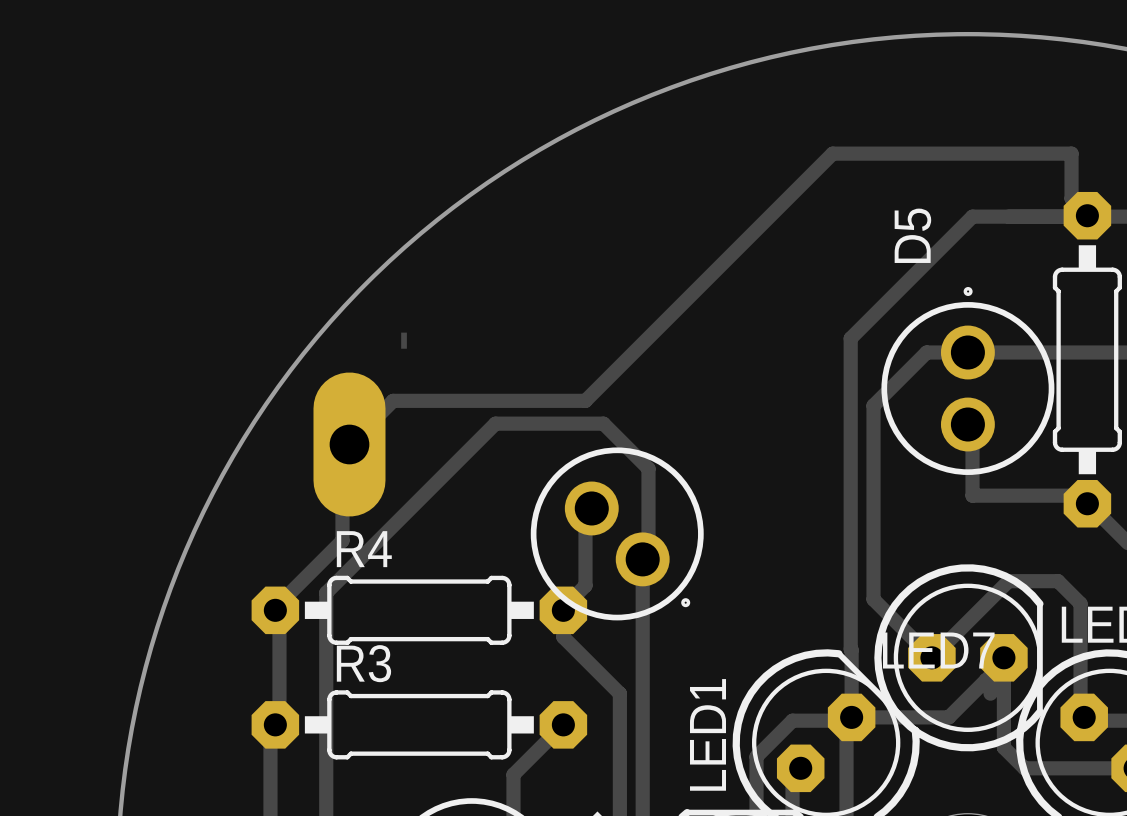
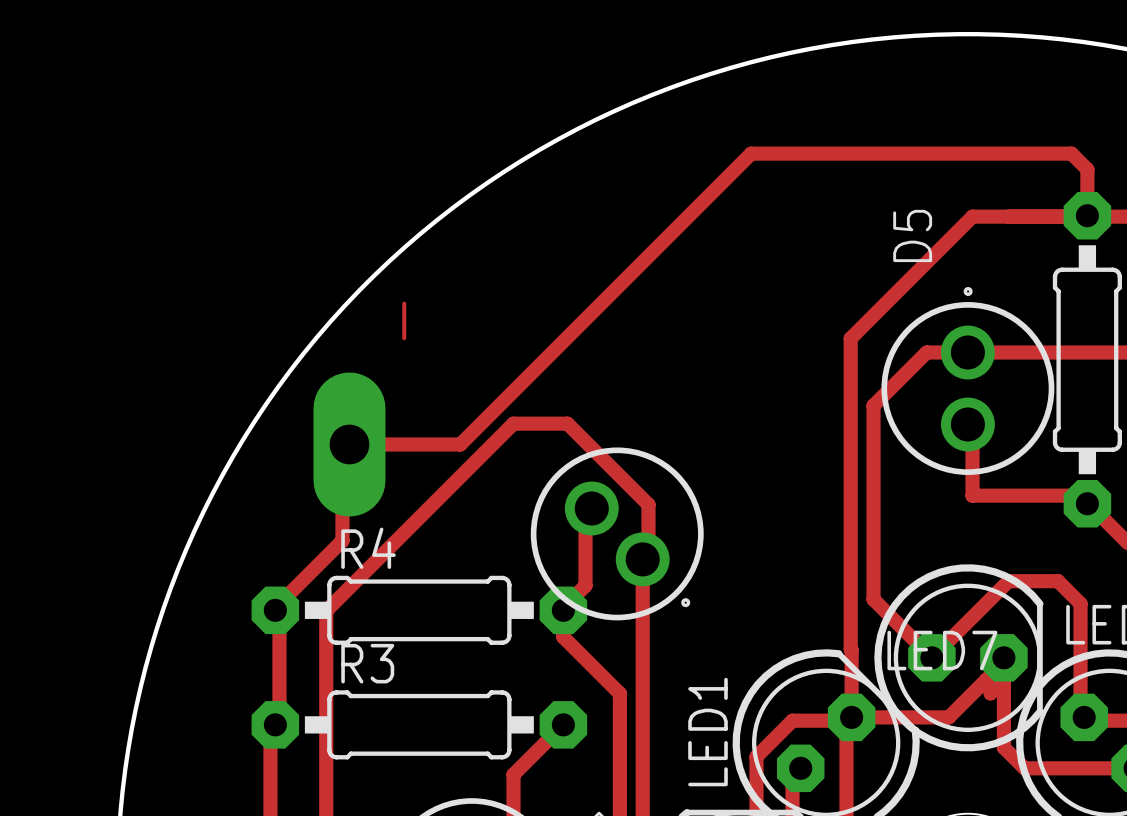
track: (832, 153) (585, 400) (393, 400) (349, 444) -> (832, 153) (751, 153) (460, 444) (349, 444)
track: (1071, 153) (1071, 198) (1089, 216) -> (1071, 153) (1087, 169) (1087, 215)
track: (513, 423) (495, 423) (326, 592) (326, 610) -> (513, 423) (326, 610)
track: (567, 423) (603, 423) (648, 468) (648, 504) -> (567, 423) (648, 504)

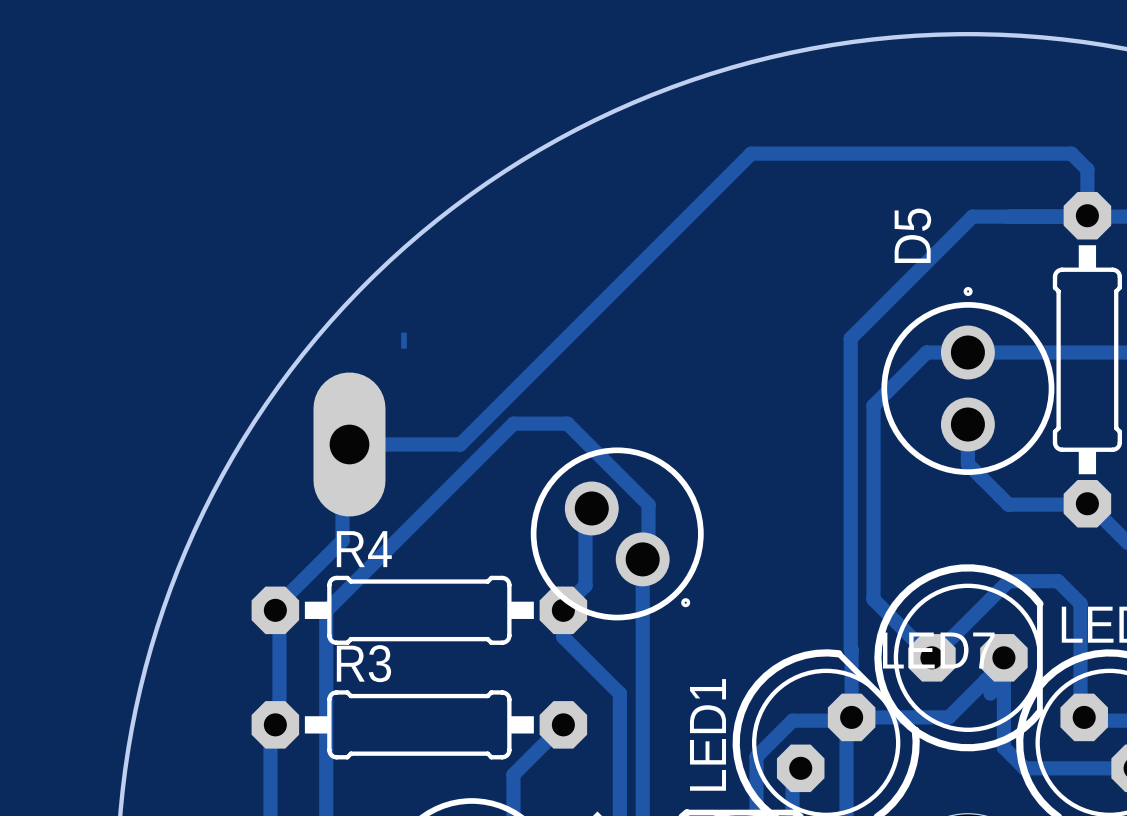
track: (967, 424) (972, 432) (972, 495) (1080, 495) (1087, 503) -> (967, 424) (967, 464) (1008, 504) (1089, 504)

